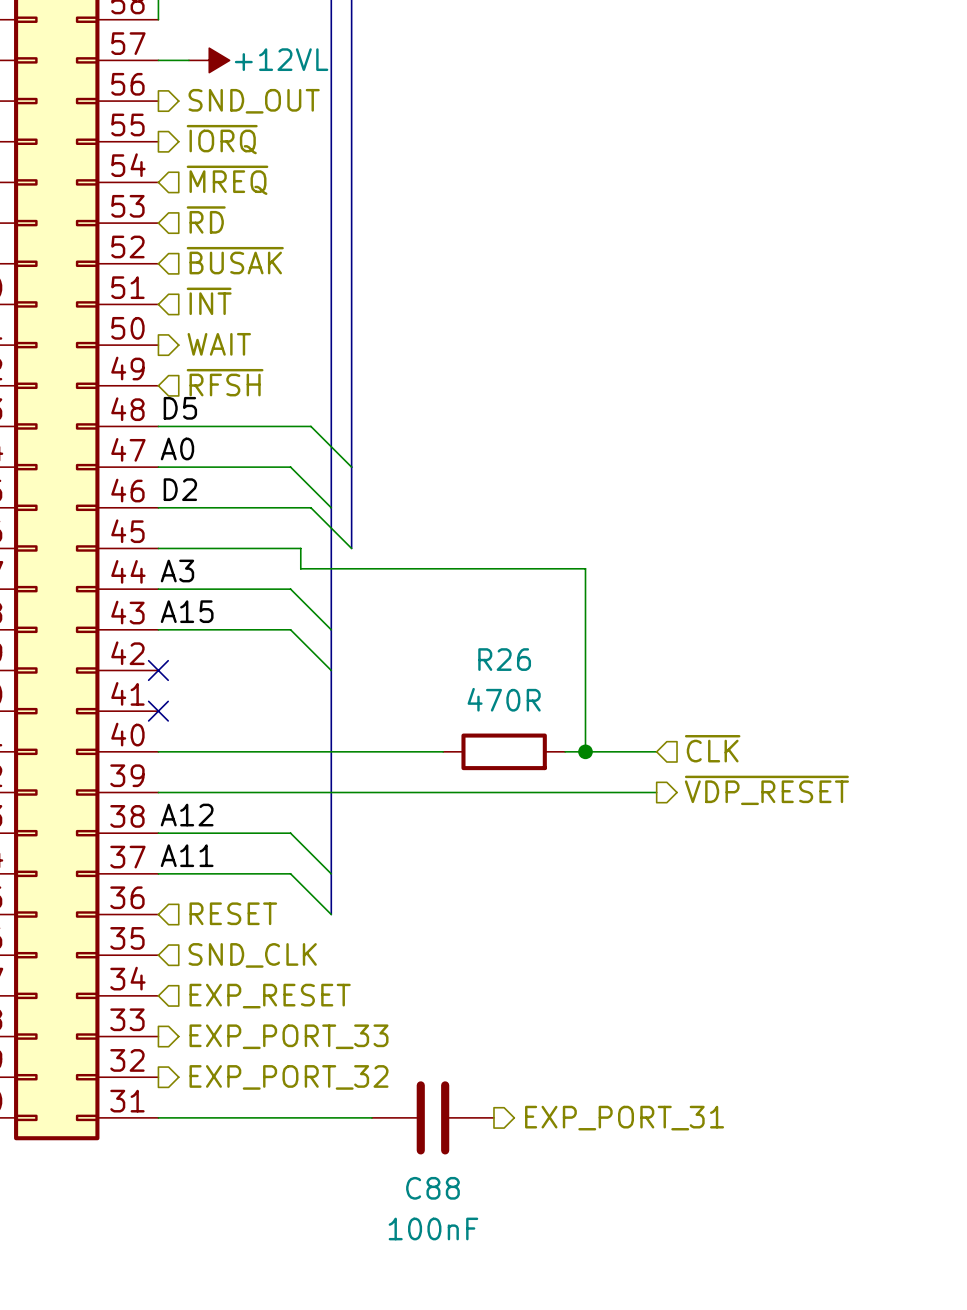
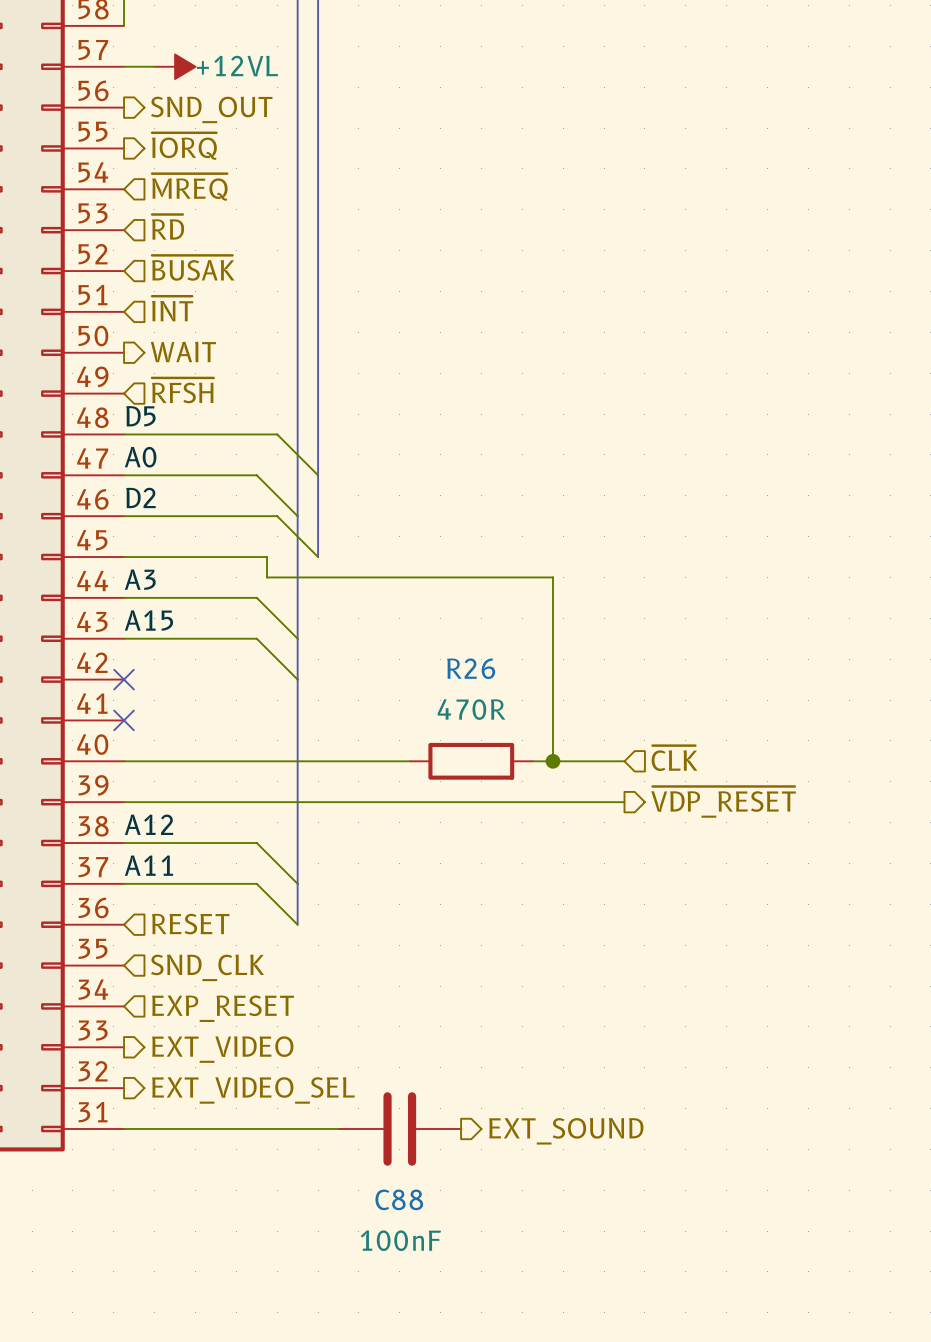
hierarchical label: EXP_PORT_33 (289, 1036) -> EXT_VIDEO (222, 1049)
hierarchical label: EXP_PORT_32 (289, 1077) -> EXT_VIDEO_SEL (253, 1090)
hierarchical label: EXP_PORT_31 (624, 1118) -> EXT_SOUND (566, 1131)

